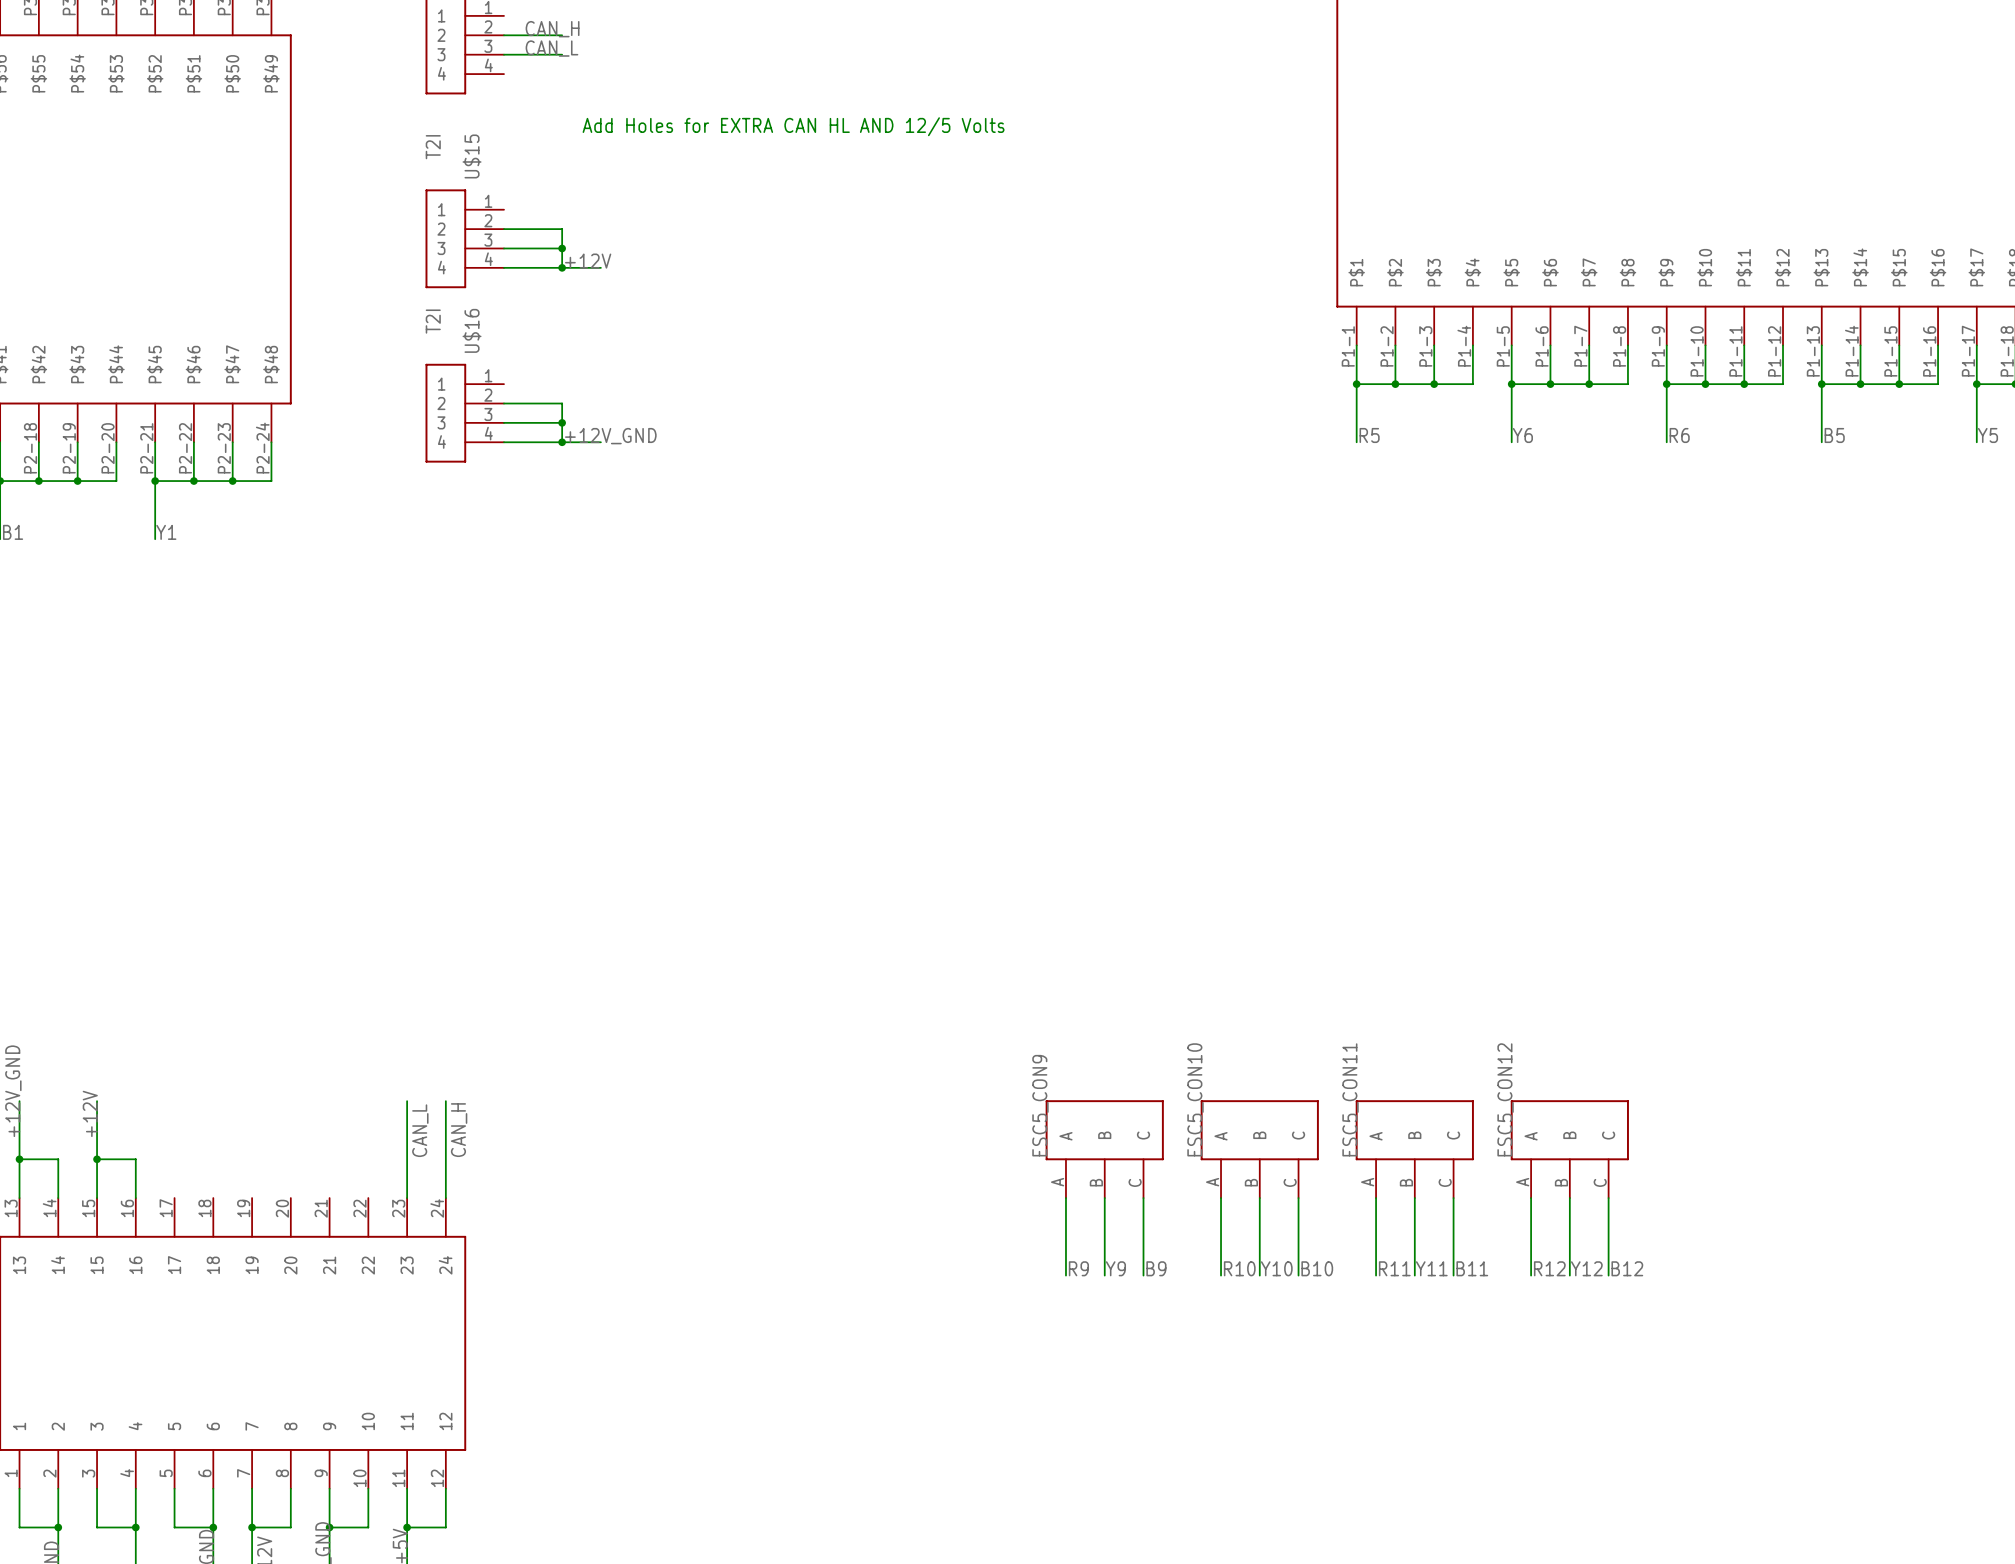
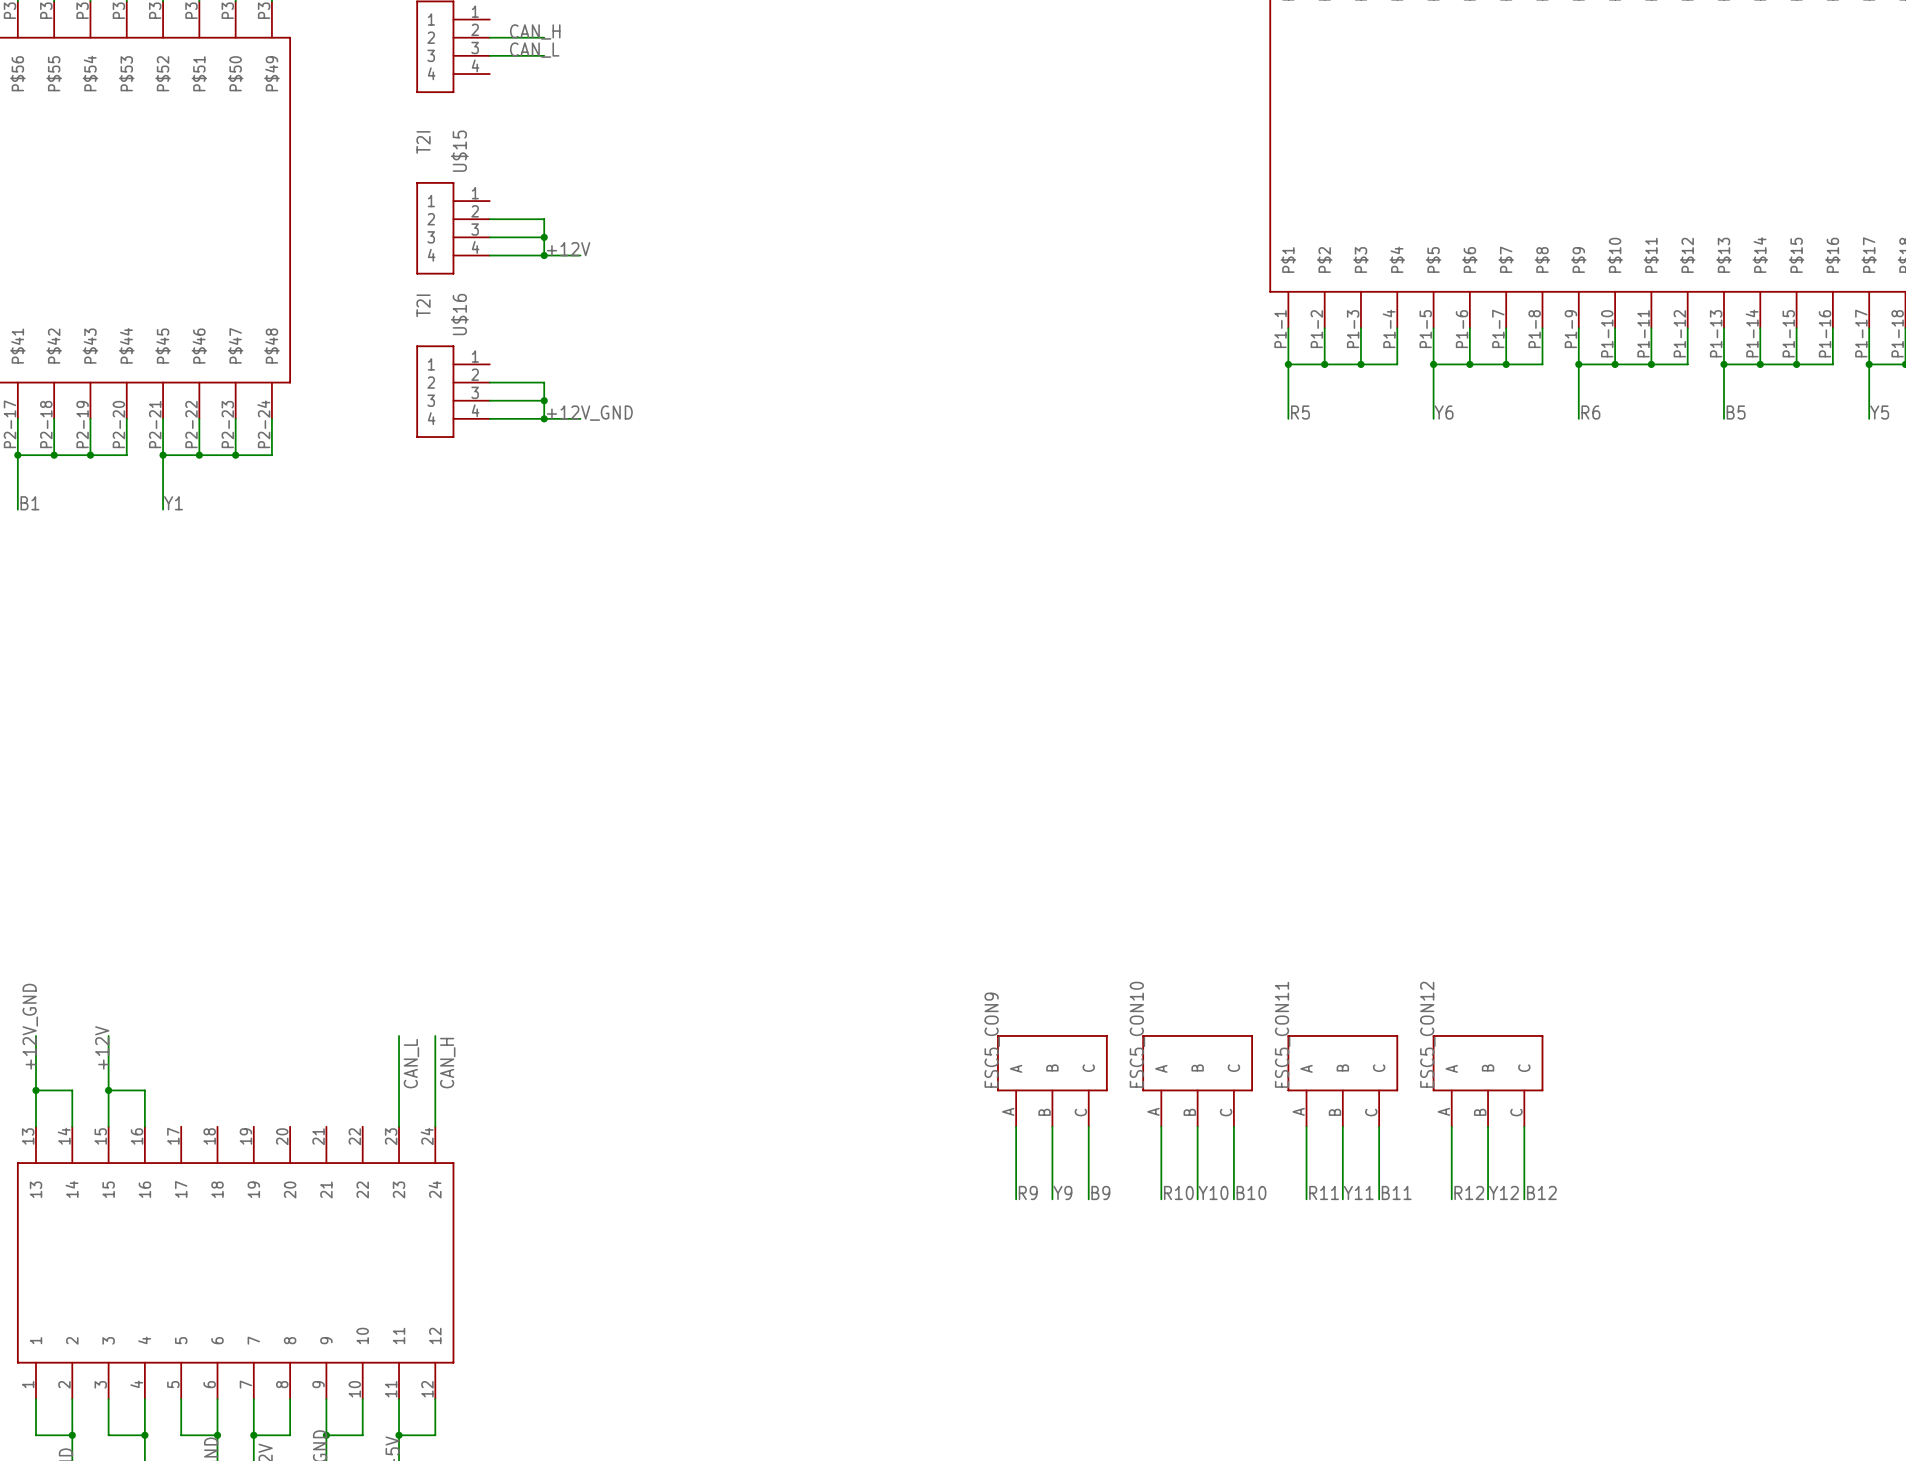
text: Add Holes for EXTRA CAN HL AND 12/5 Volts (793, 126) -> none

